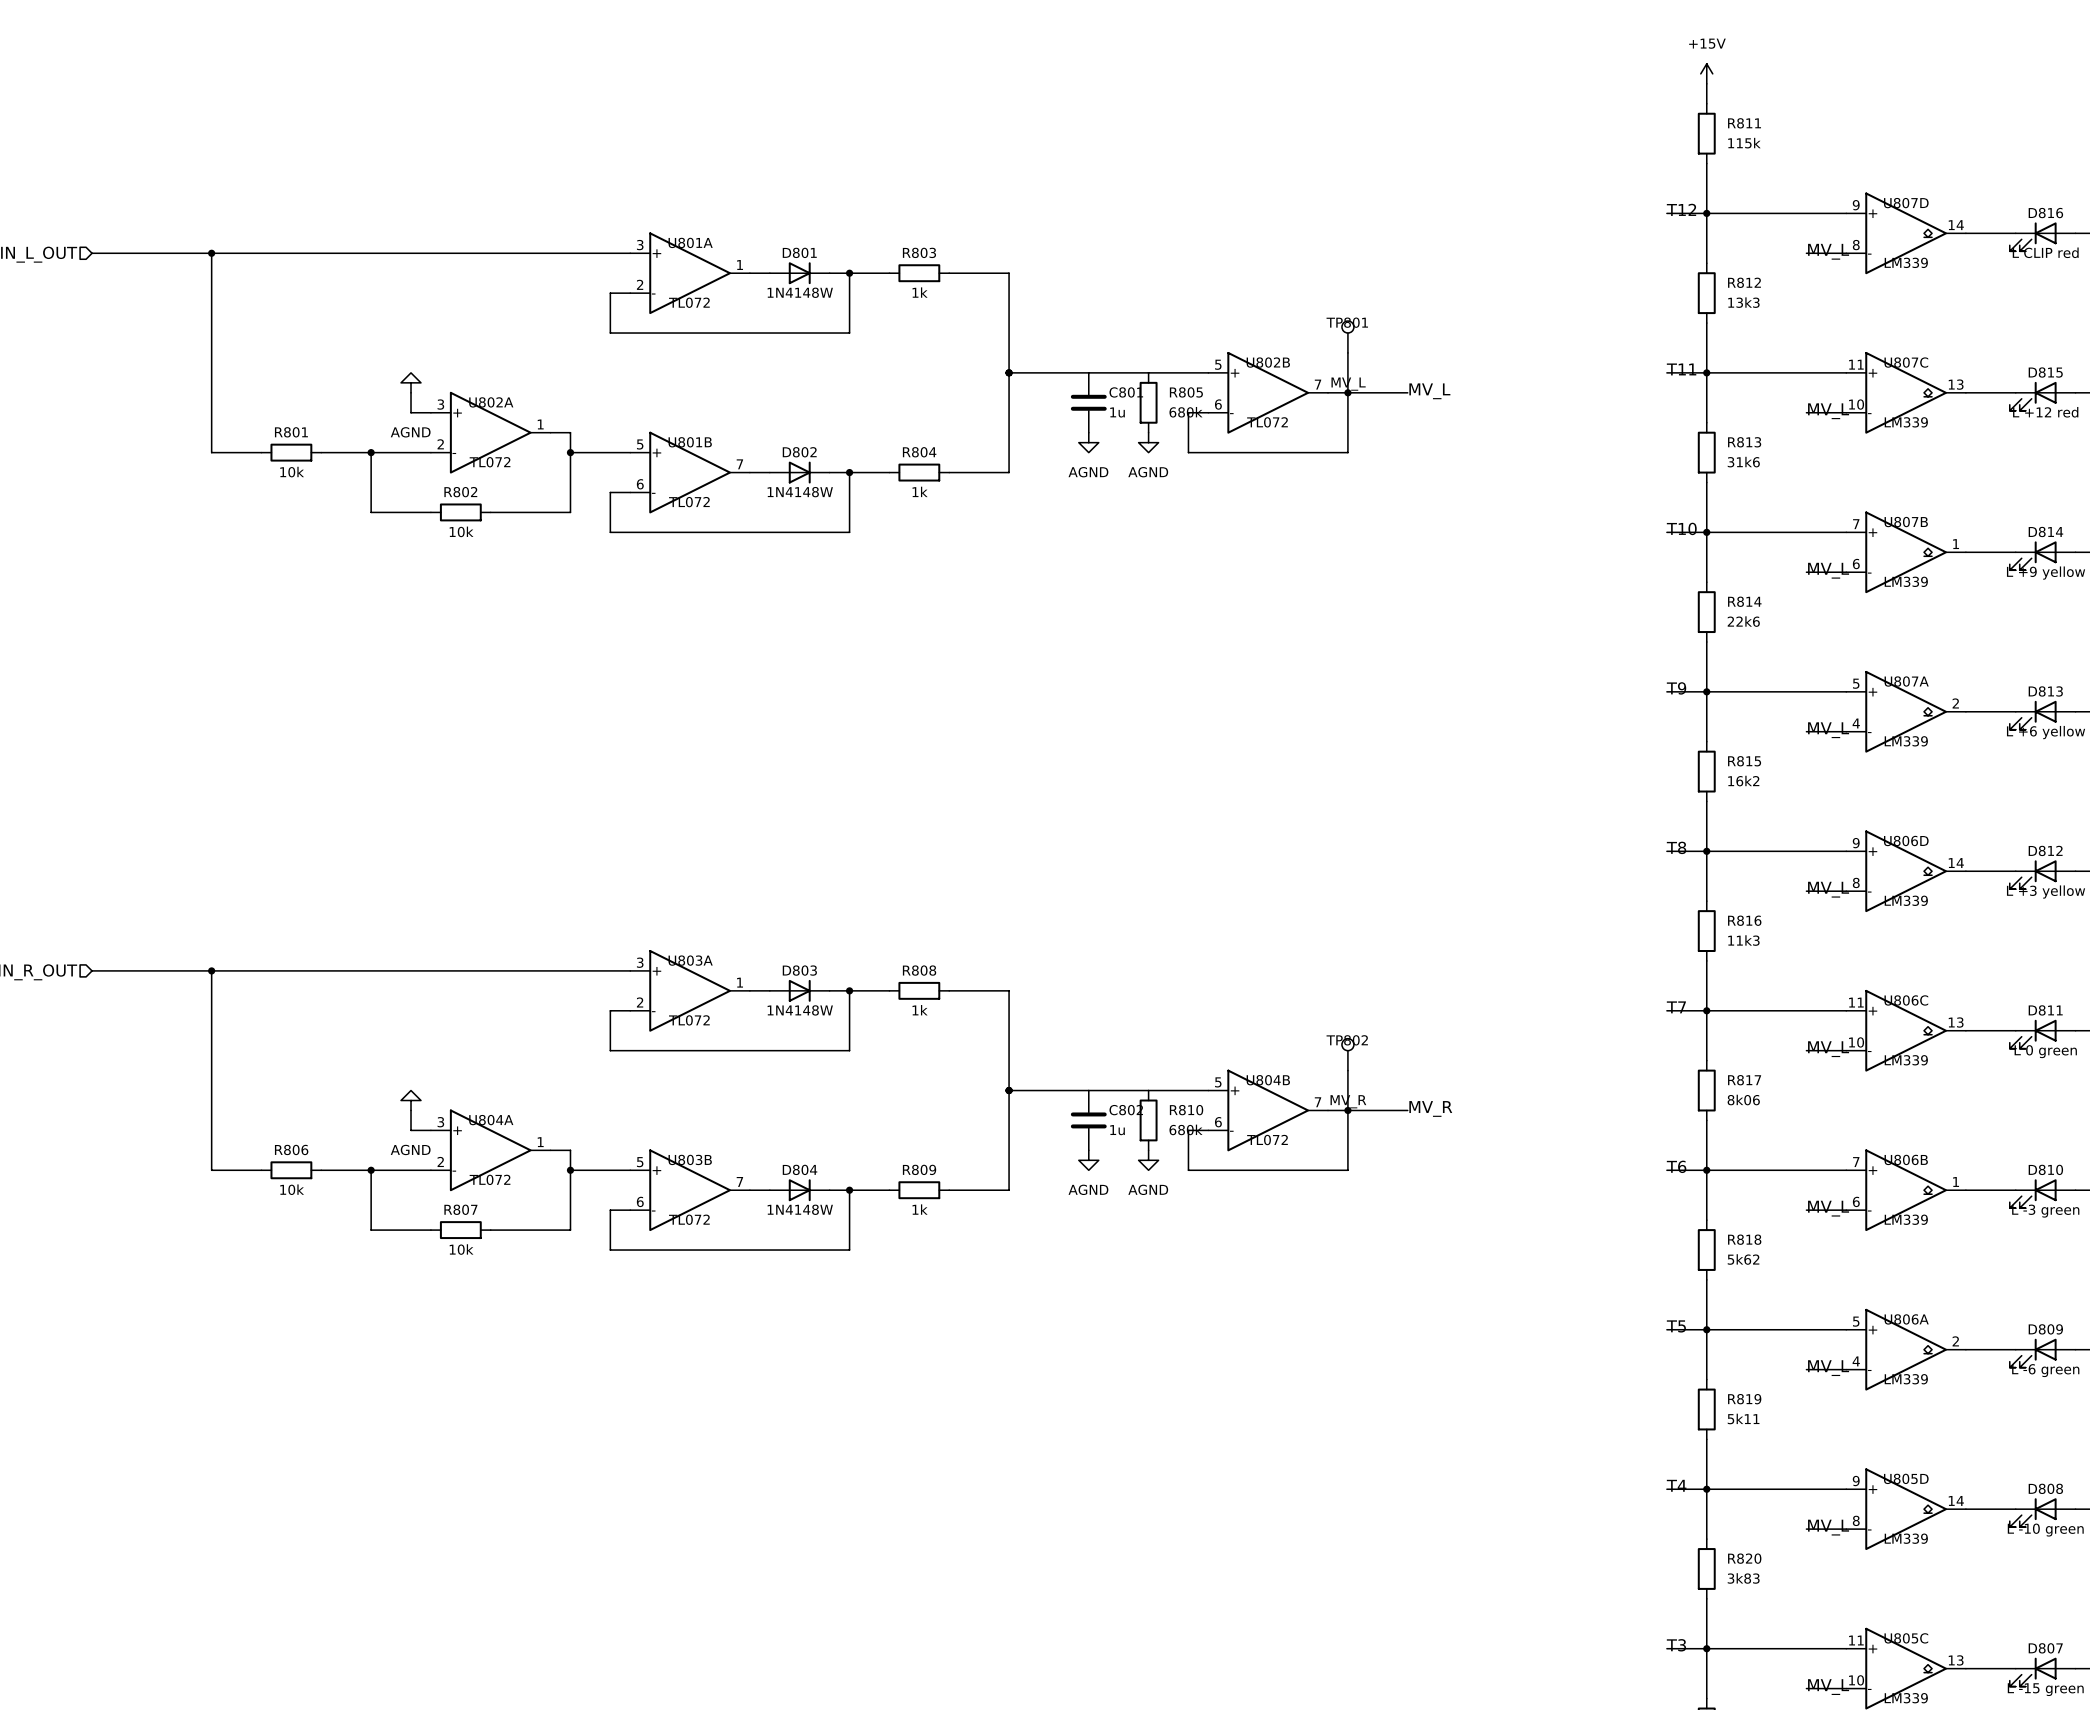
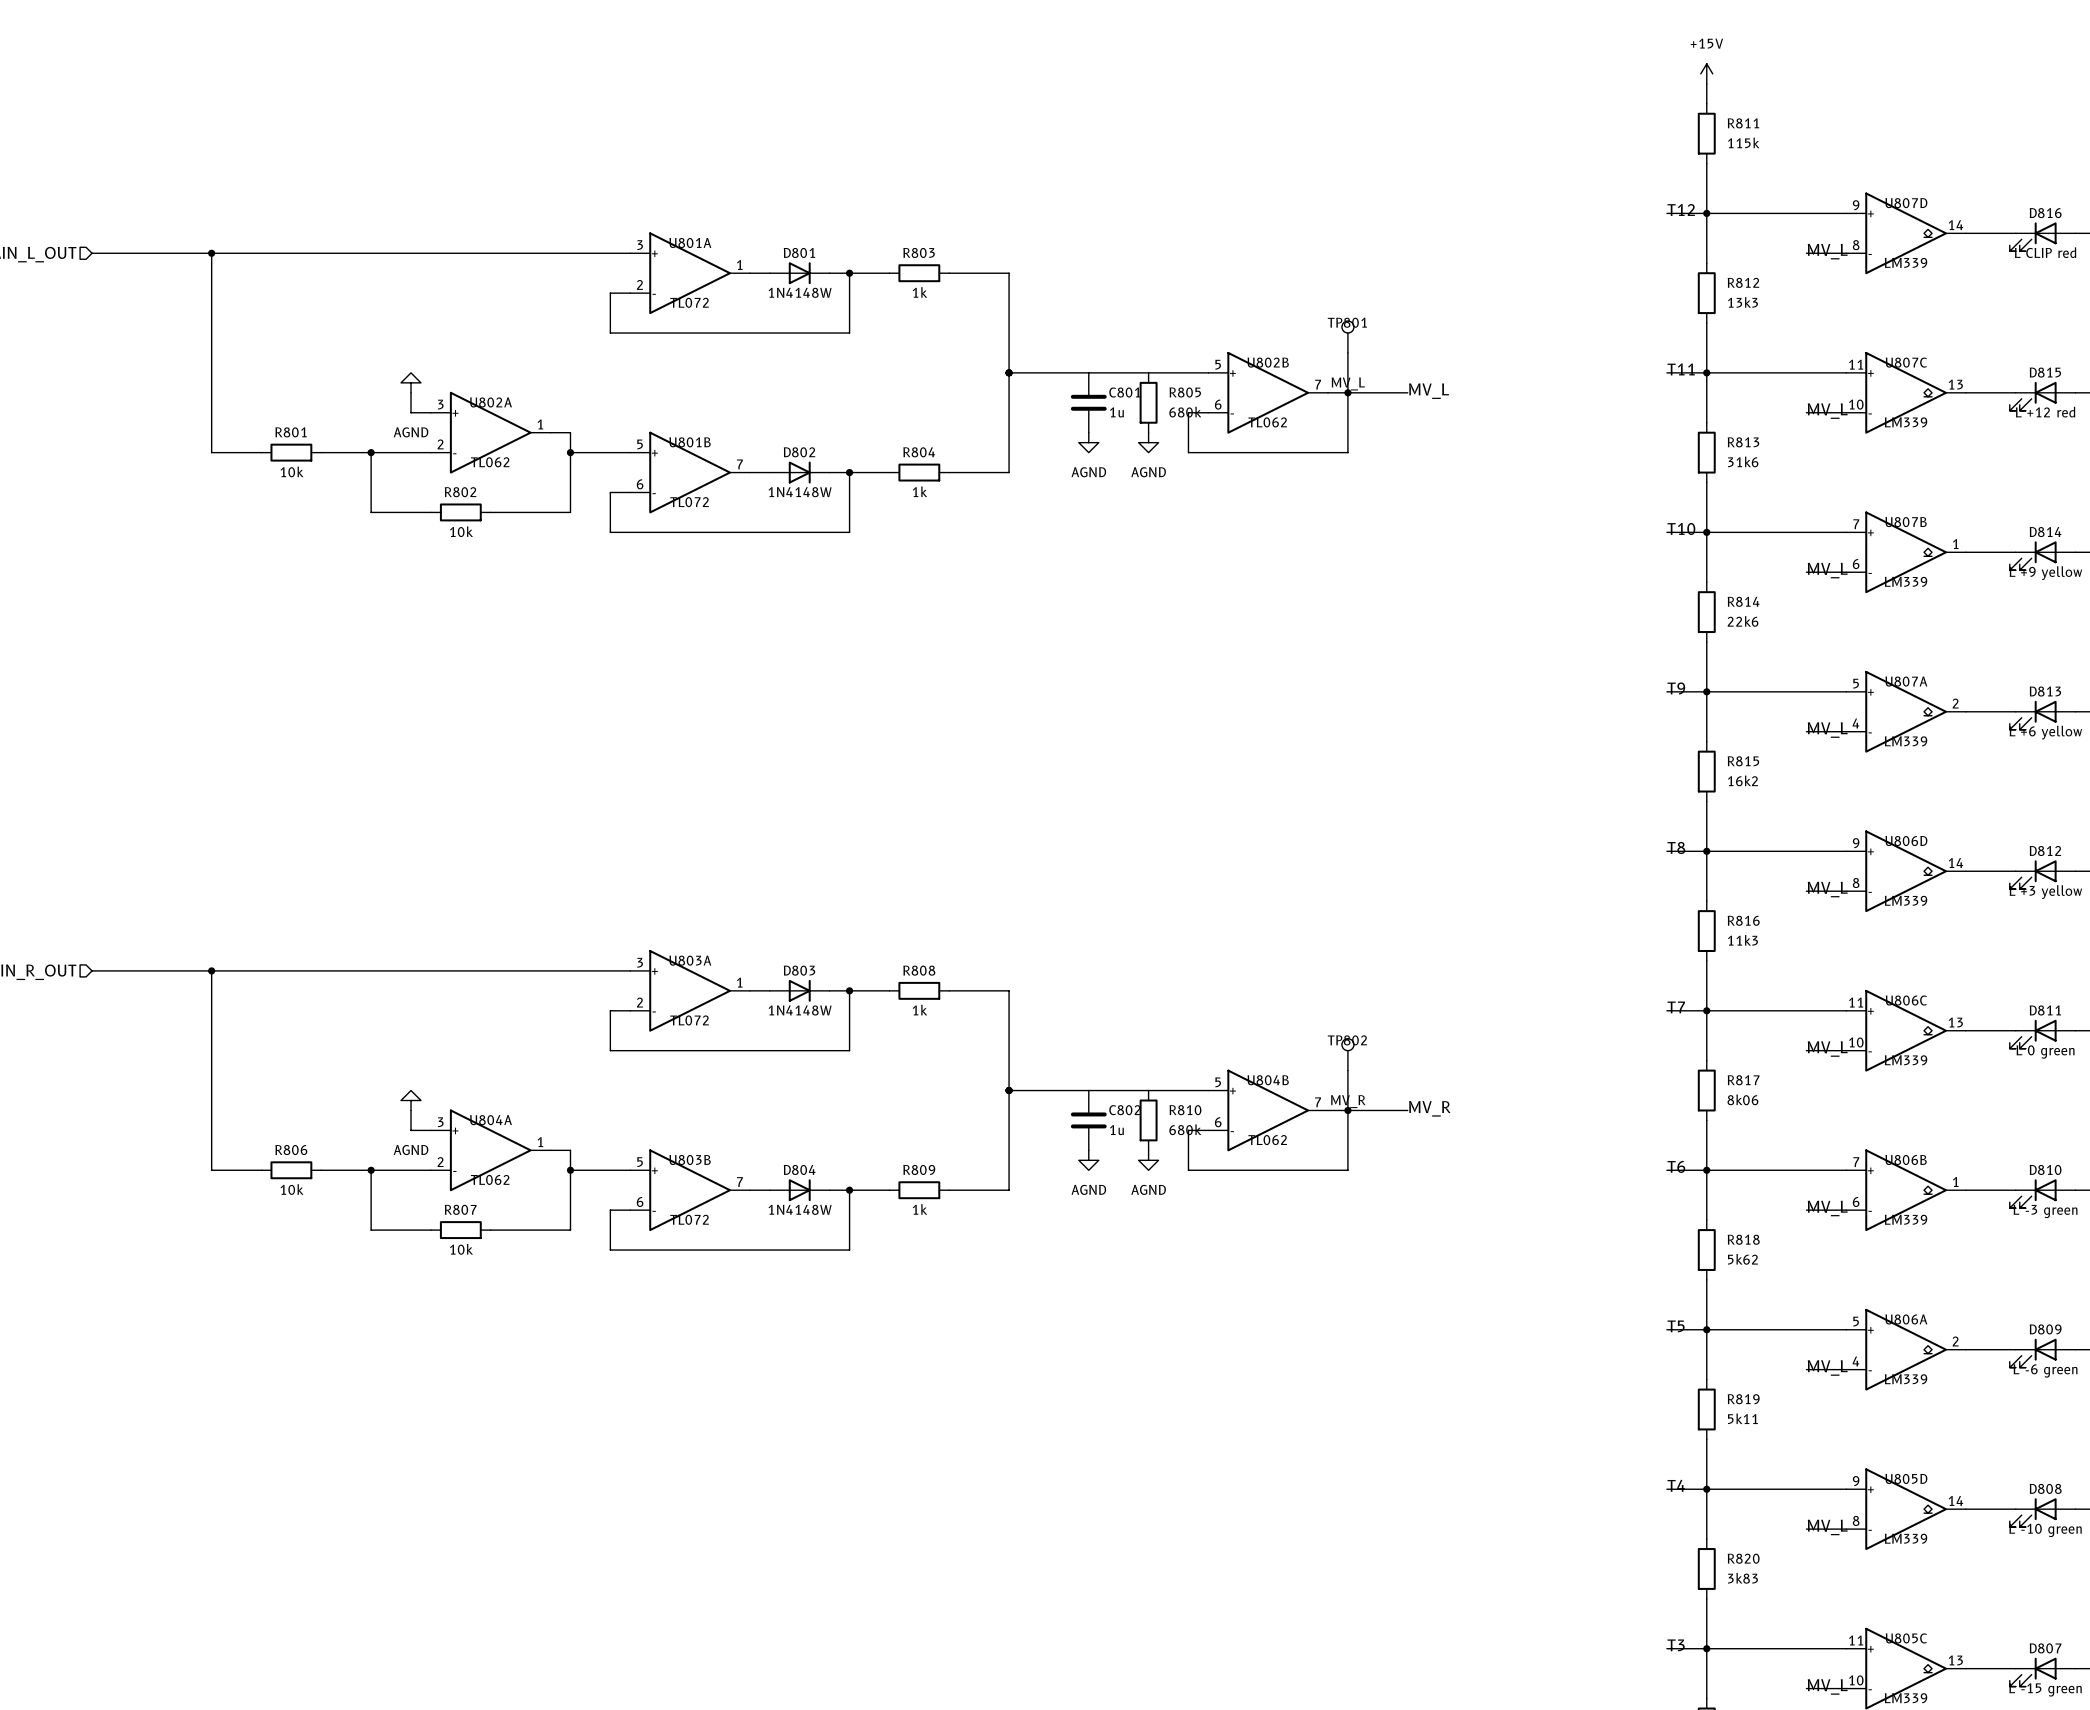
U802B value: TL072 (1267, 422) -> TL062 (1267, 422)
U802A value: TL072 (490, 462) -> TL062 (490, 462)
U804B value: TL072 (1267, 1140) -> TL062 (1267, 1140)
U804A value: TL072 (490, 1179) -> TL062 (490, 1179)

